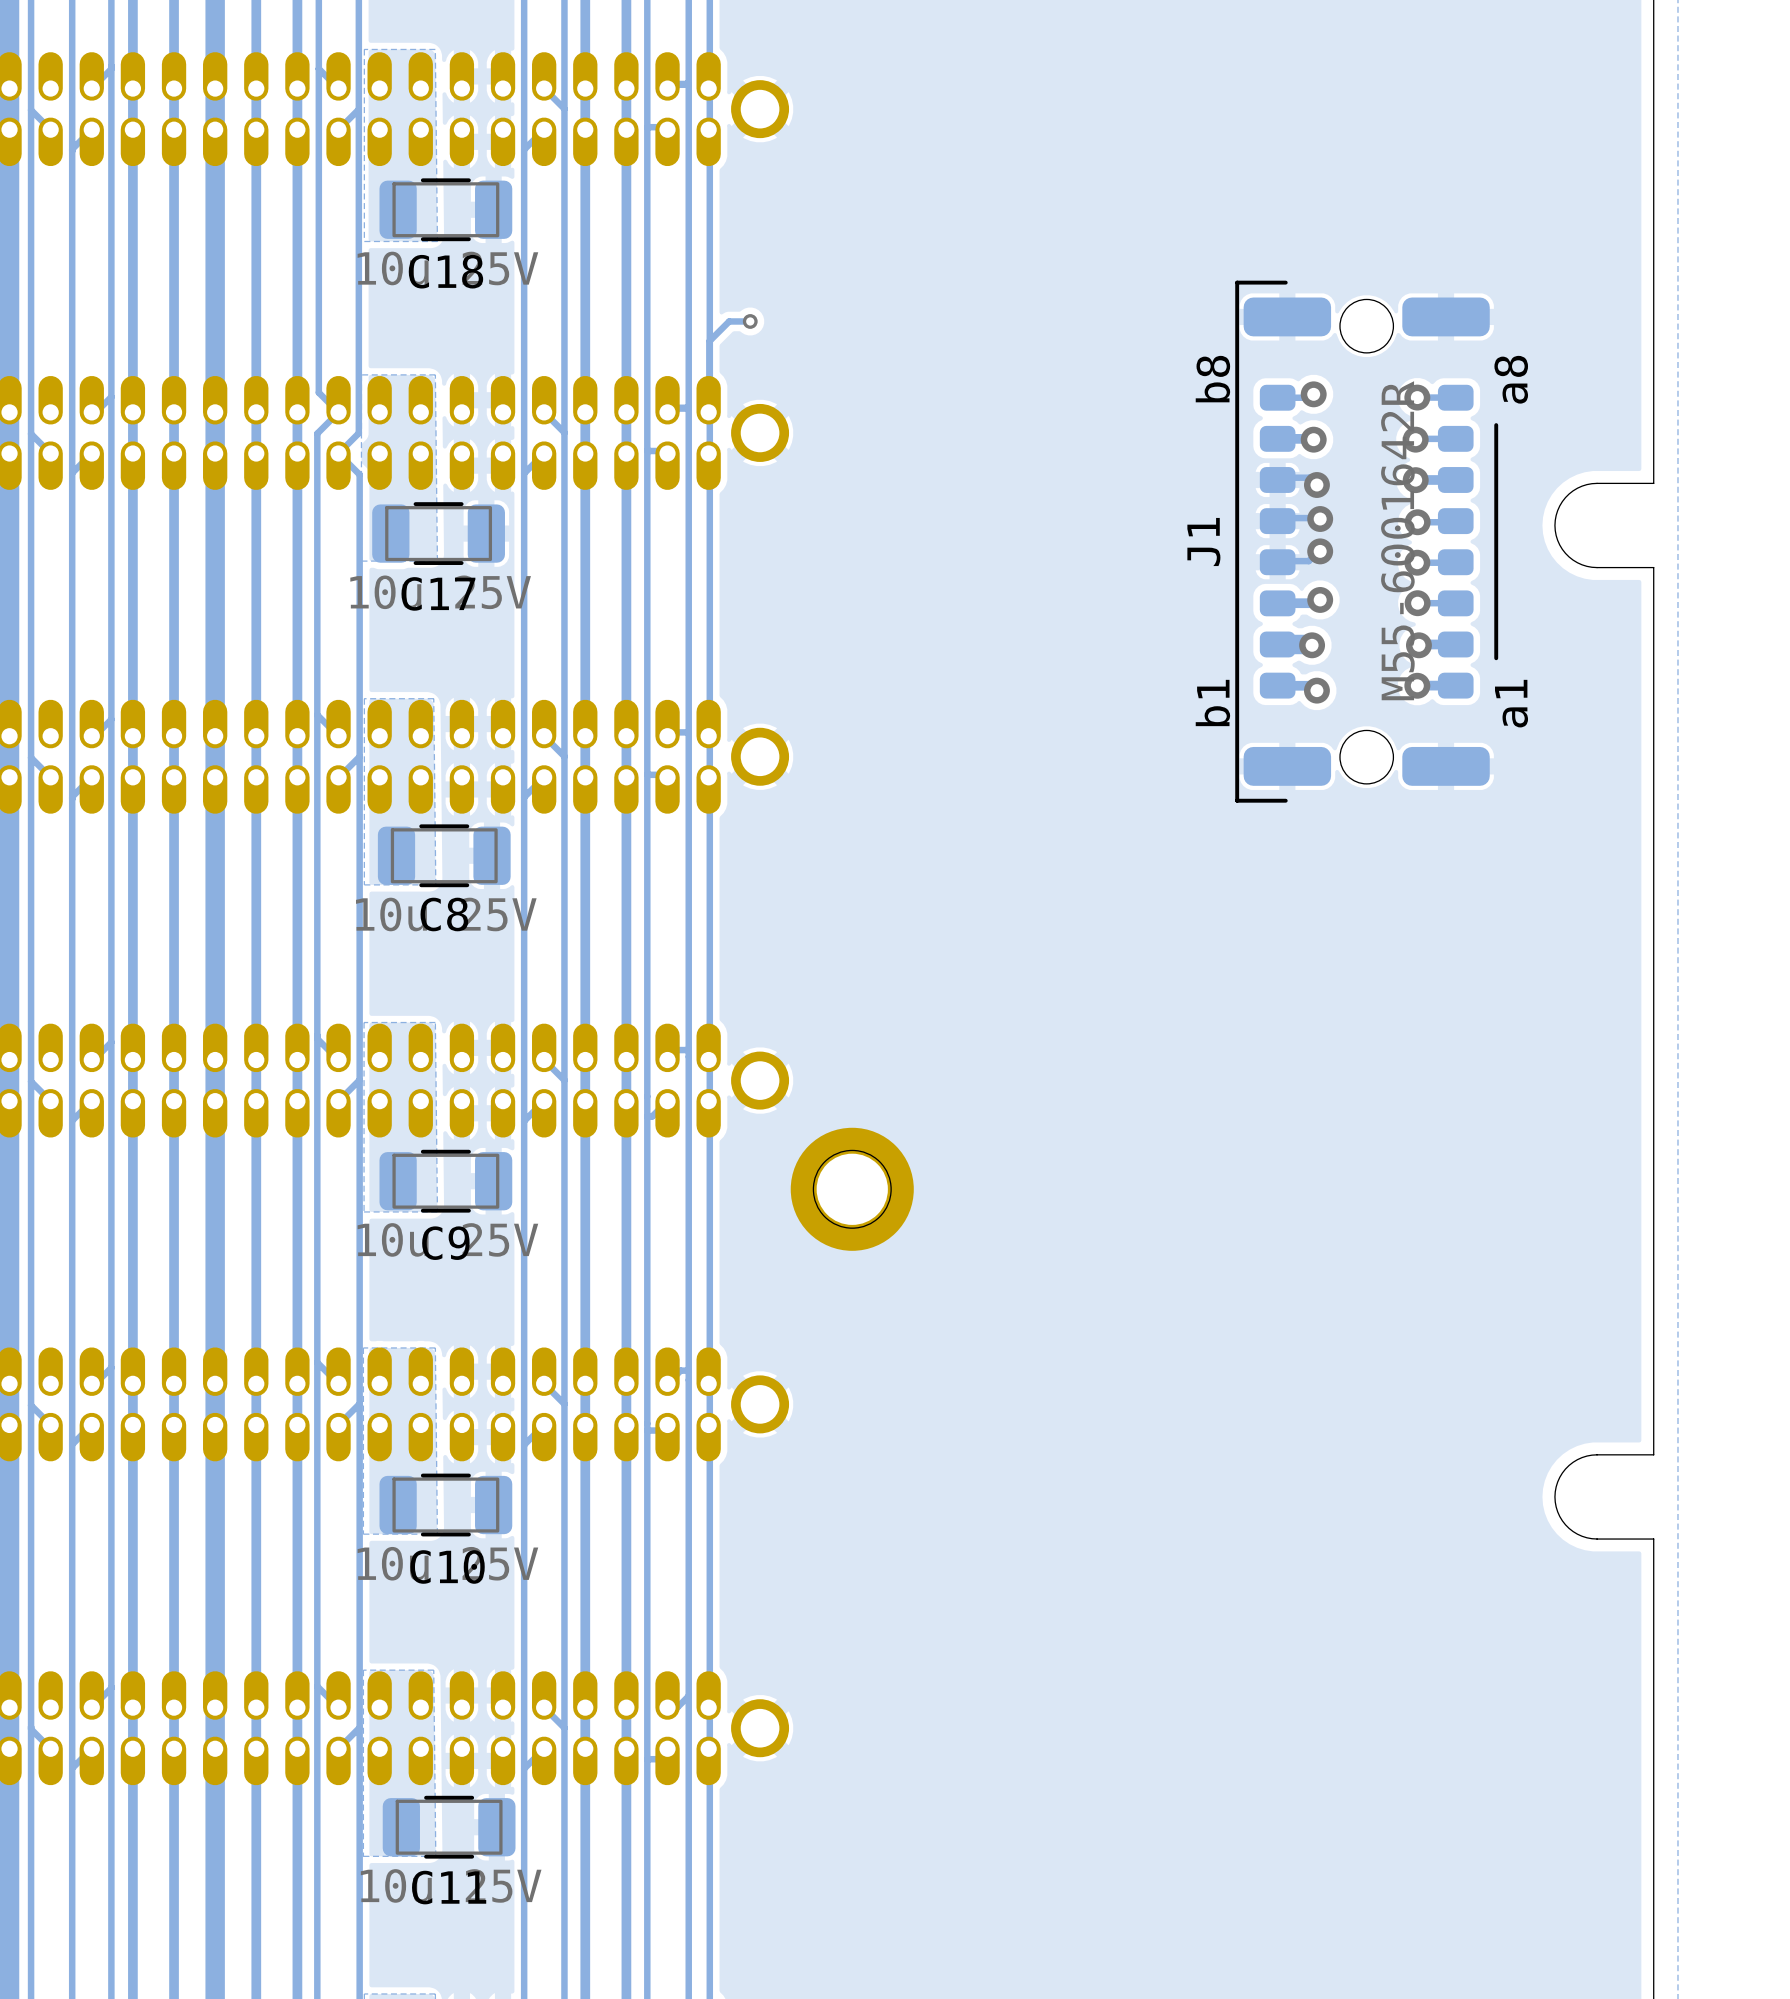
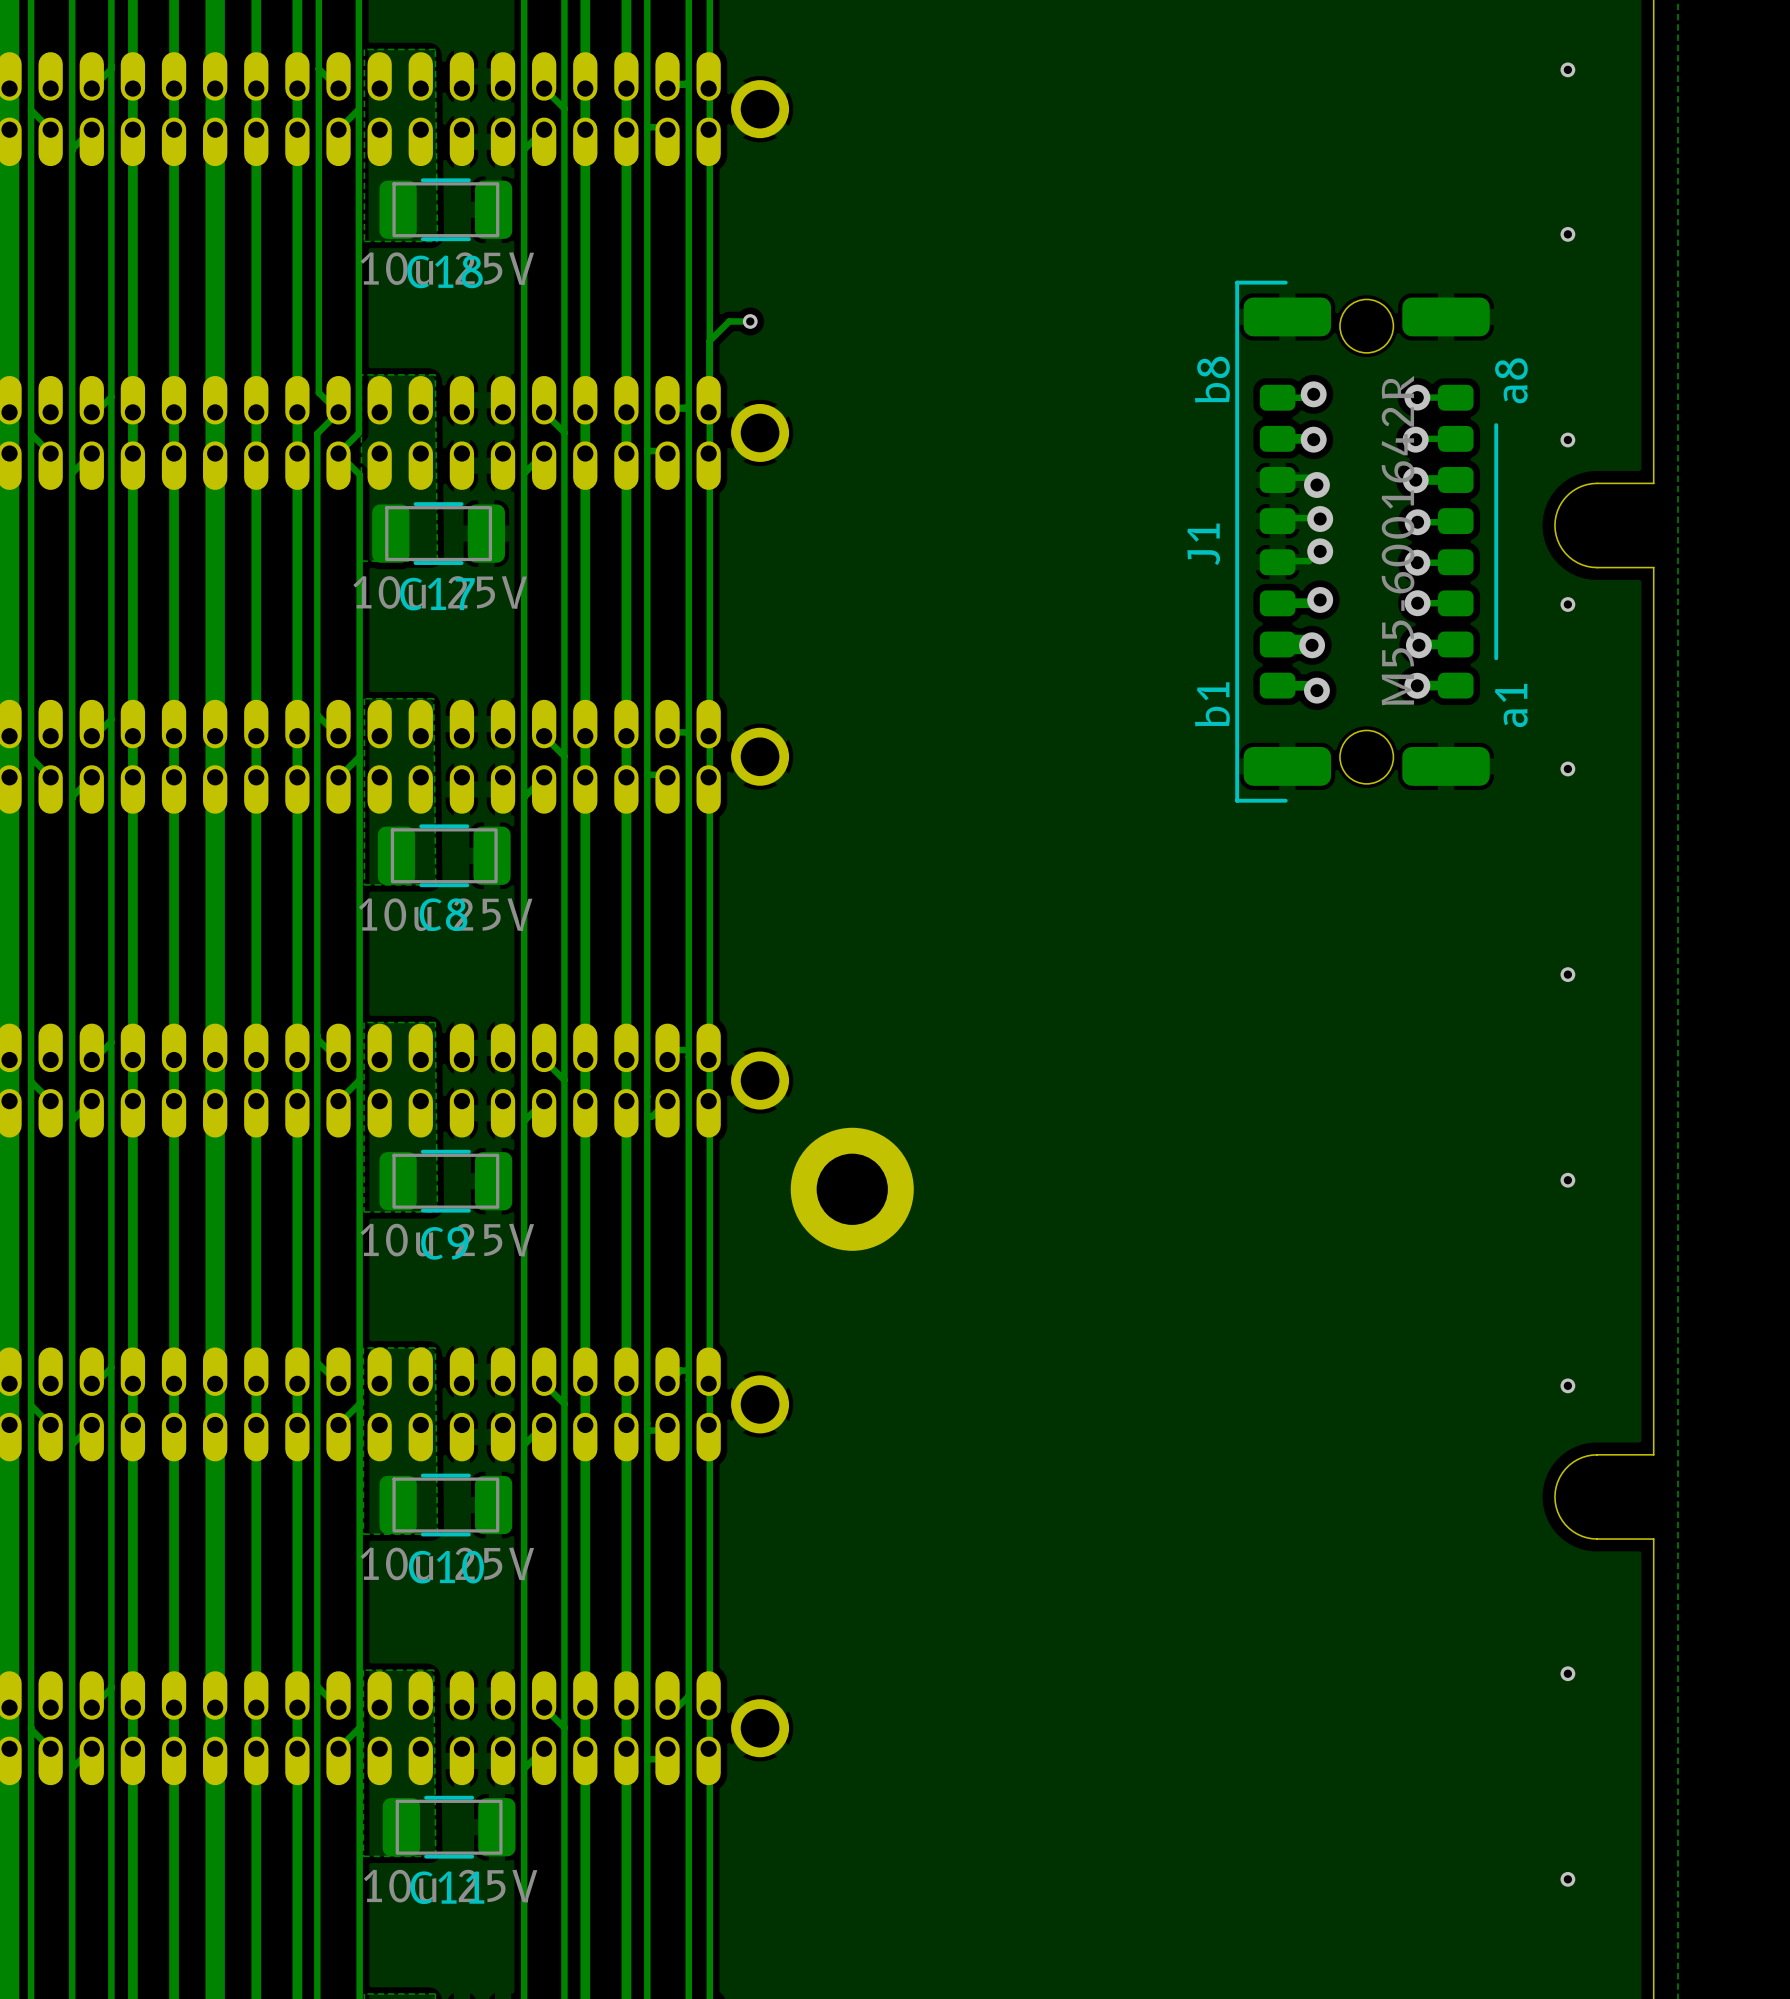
via: none -> (1567, 69)
via: none -> (1567, 234)
via: none -> (1567, 439)
via: none -> (1567, 604)
via: none -> (1567, 768)
via: none -> (1567, 974)
via: none -> (1567, 1180)
via: none -> (1567, 1385)
via: none -> (1567, 1673)
via: none -> (1567, 1879)

